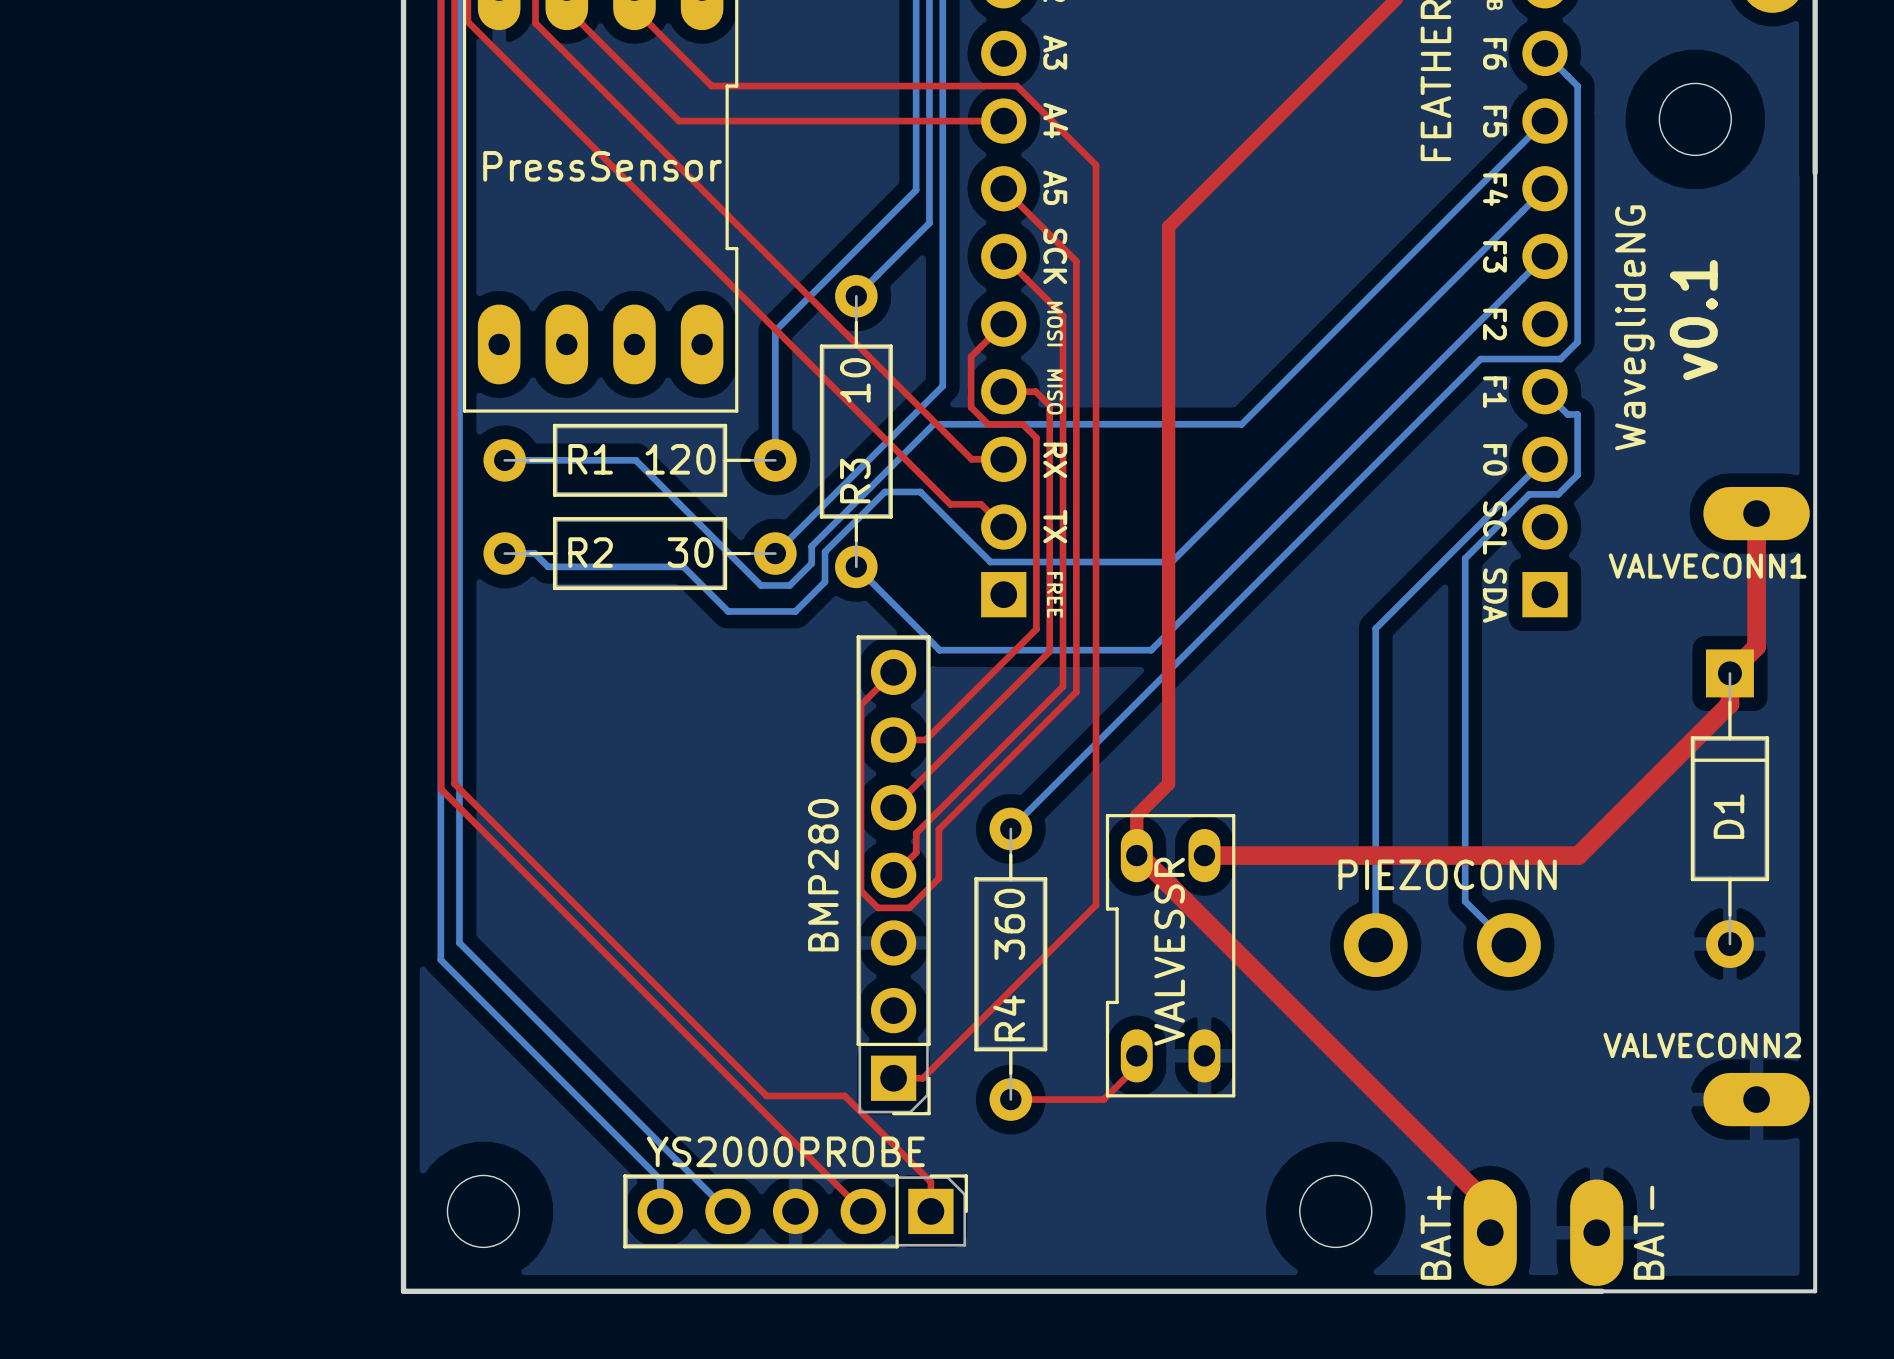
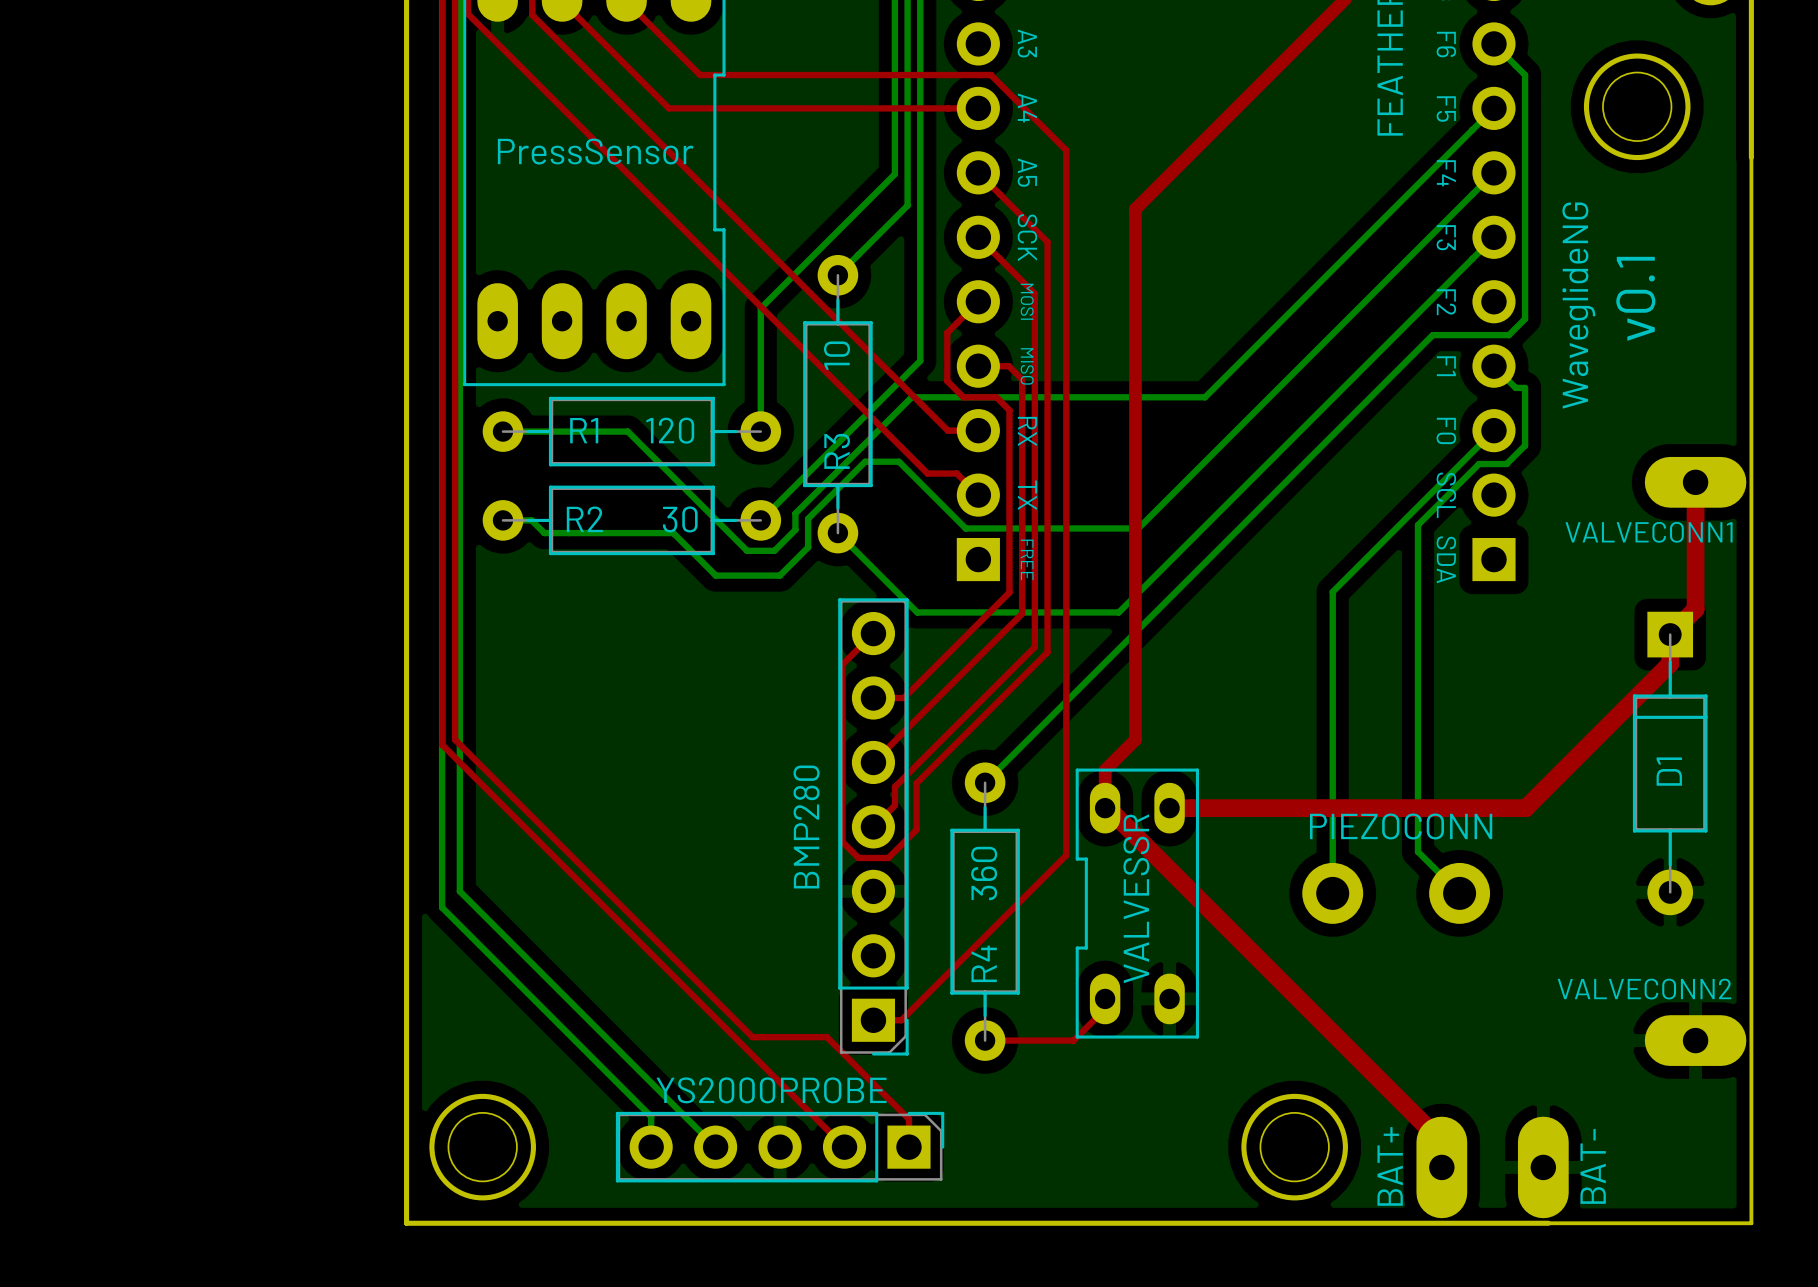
round board edge: none -> [1583, 53, 1691, 161]
round board edge: none -> [429, 1093, 536, 1201]
round board edge: none -> [1241, 1093, 1348, 1201]

